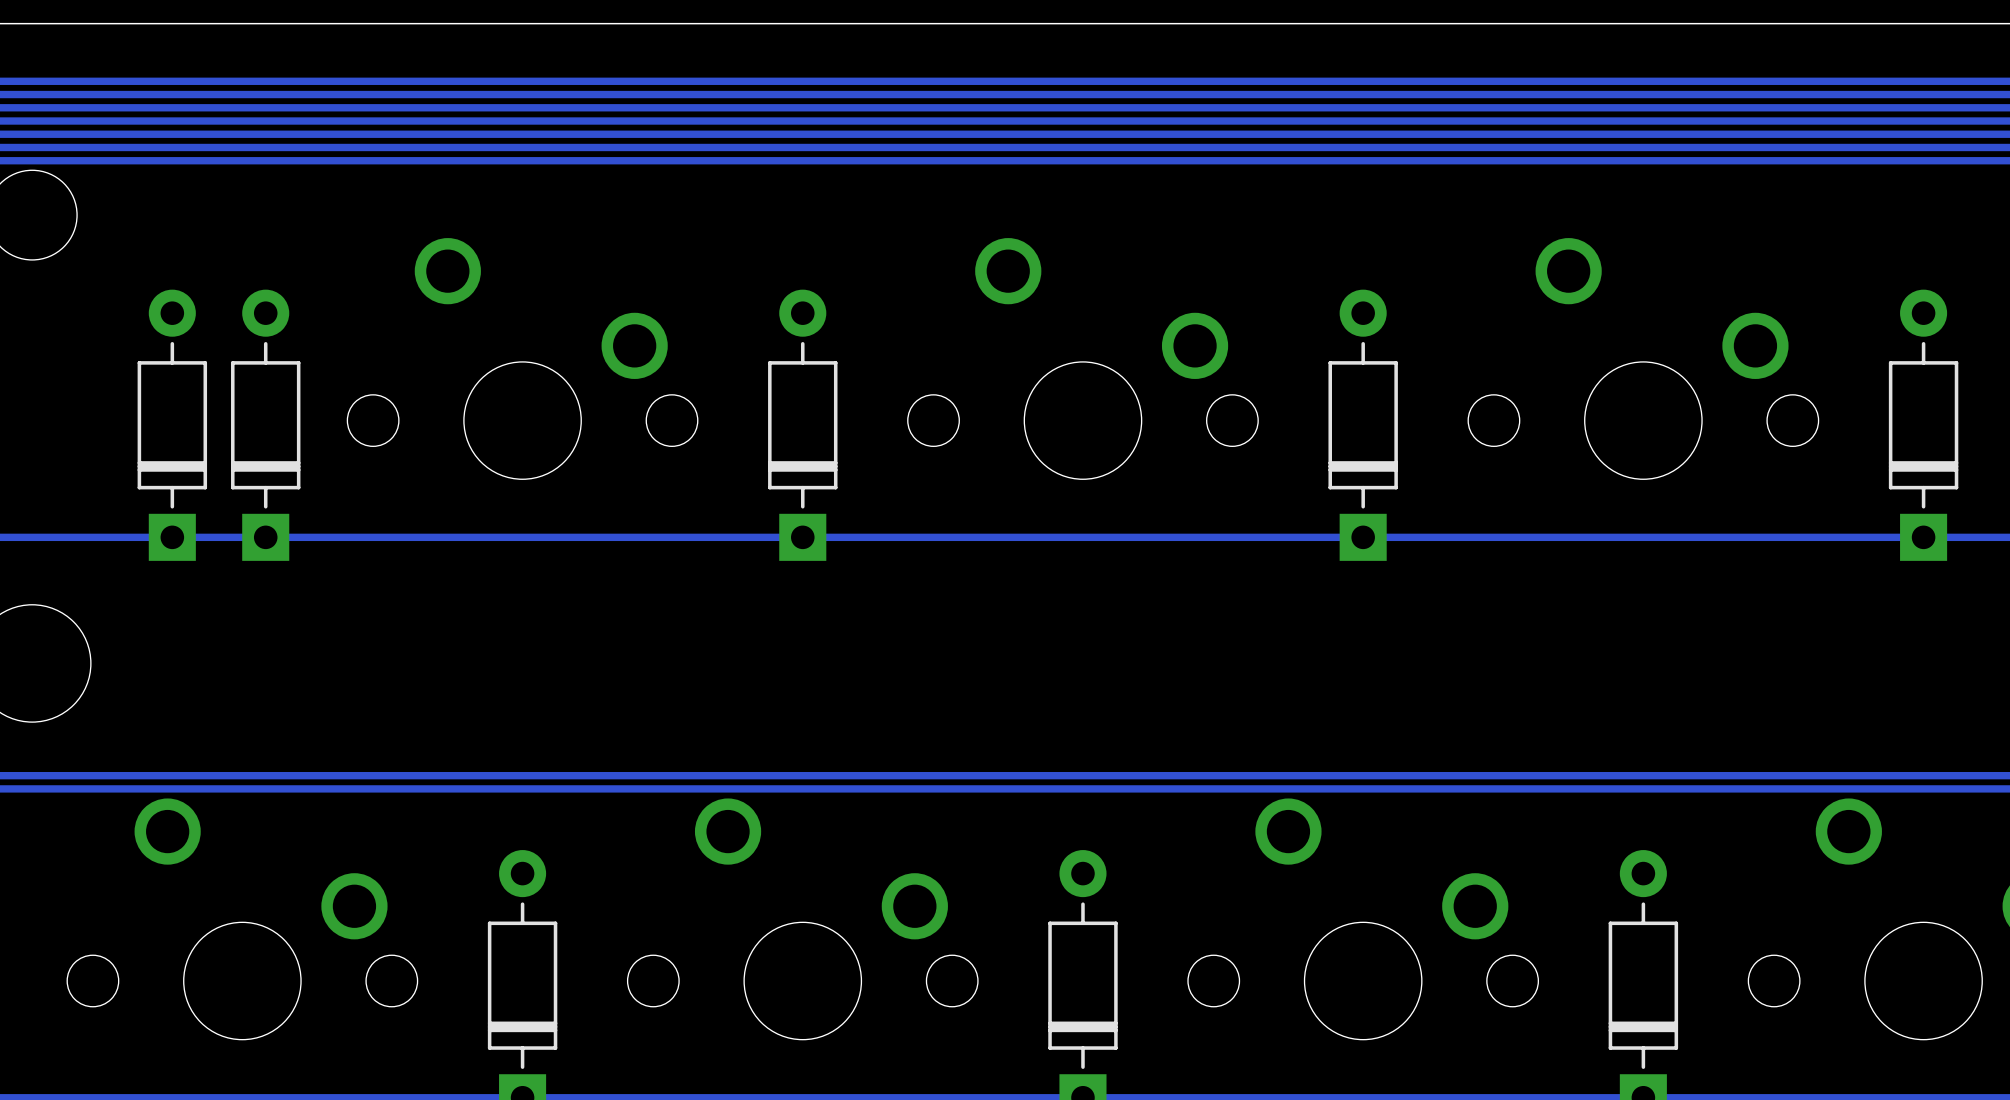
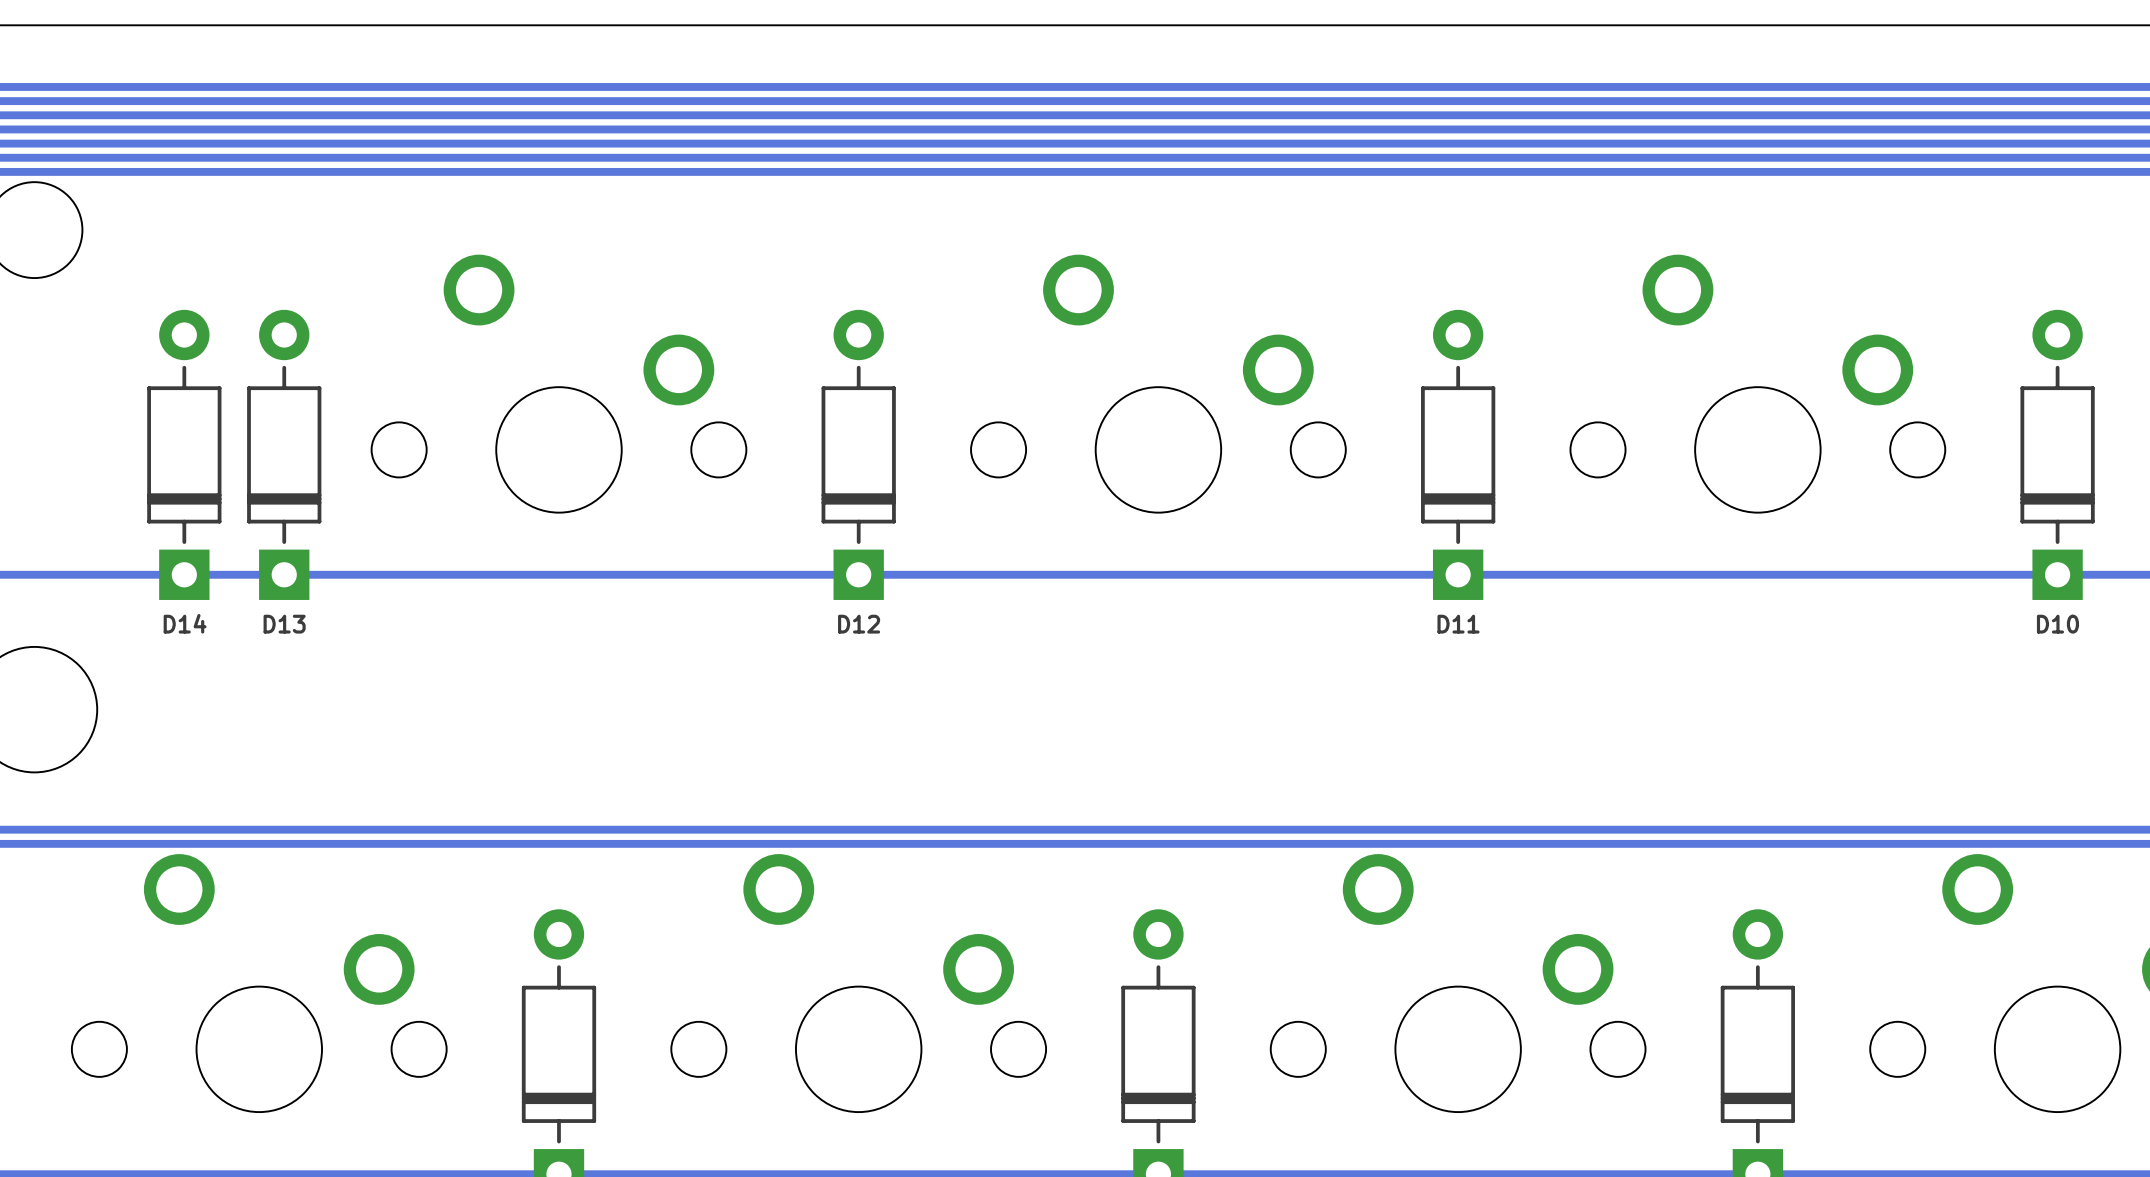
D14 name: none -> D14 (185, 623)
D13 name: none -> D13 (284, 624)
D12 name: none -> D12 (859, 624)
D11 name: none -> D11 (1458, 624)
D10 name: none -> D10 (2057, 624)

